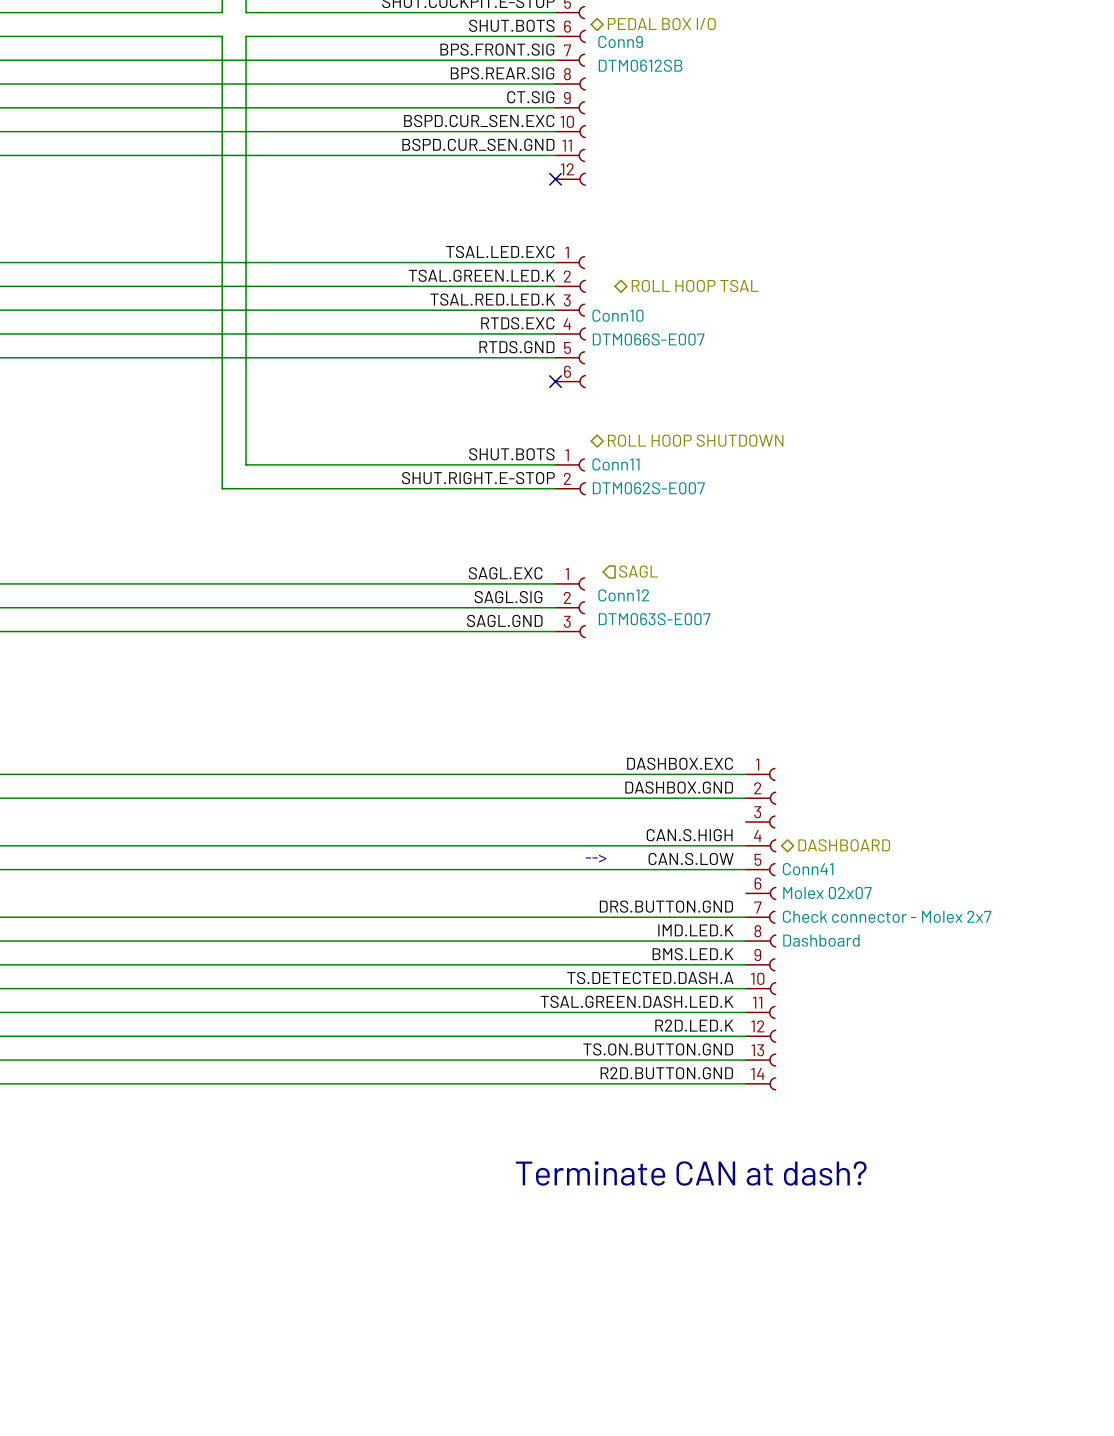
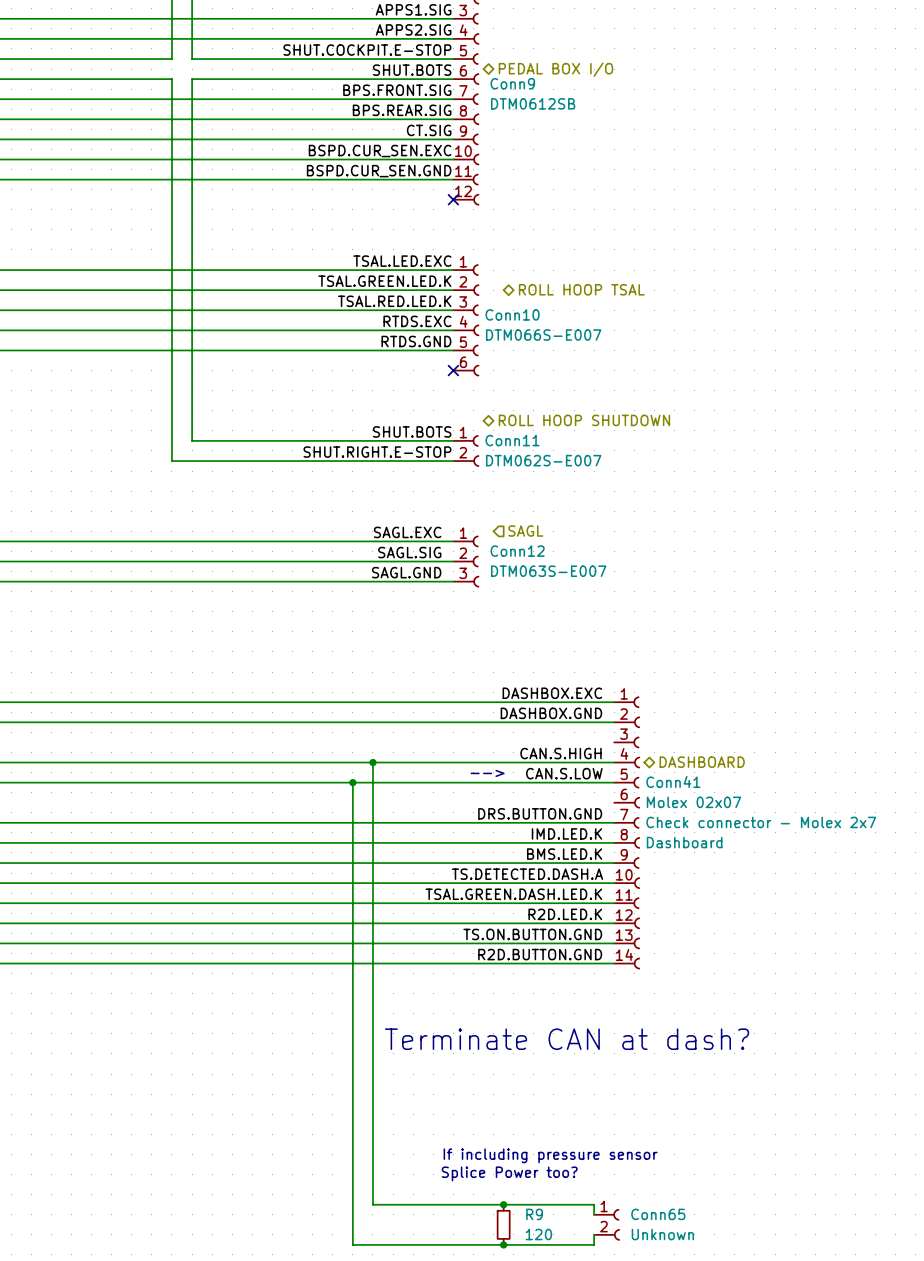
wire: none -> (372, 762) (372, 1204) (594, 1204) (594, 1214)
junction: none -> (372, 762)
wire: none -> (352, 782) (352, 1244) (594, 1244) (594, 1234)
junction: none -> (352, 782)
text: none -> If including pressure sensor (550, 1155)
text: none -> Splice Power too? (509, 1173)
junction: none -> (503, 1204)
R9: none -> 120 (503, 1224)
Conn65: none -> (606, 1224)
junction: none -> (503, 1244)

